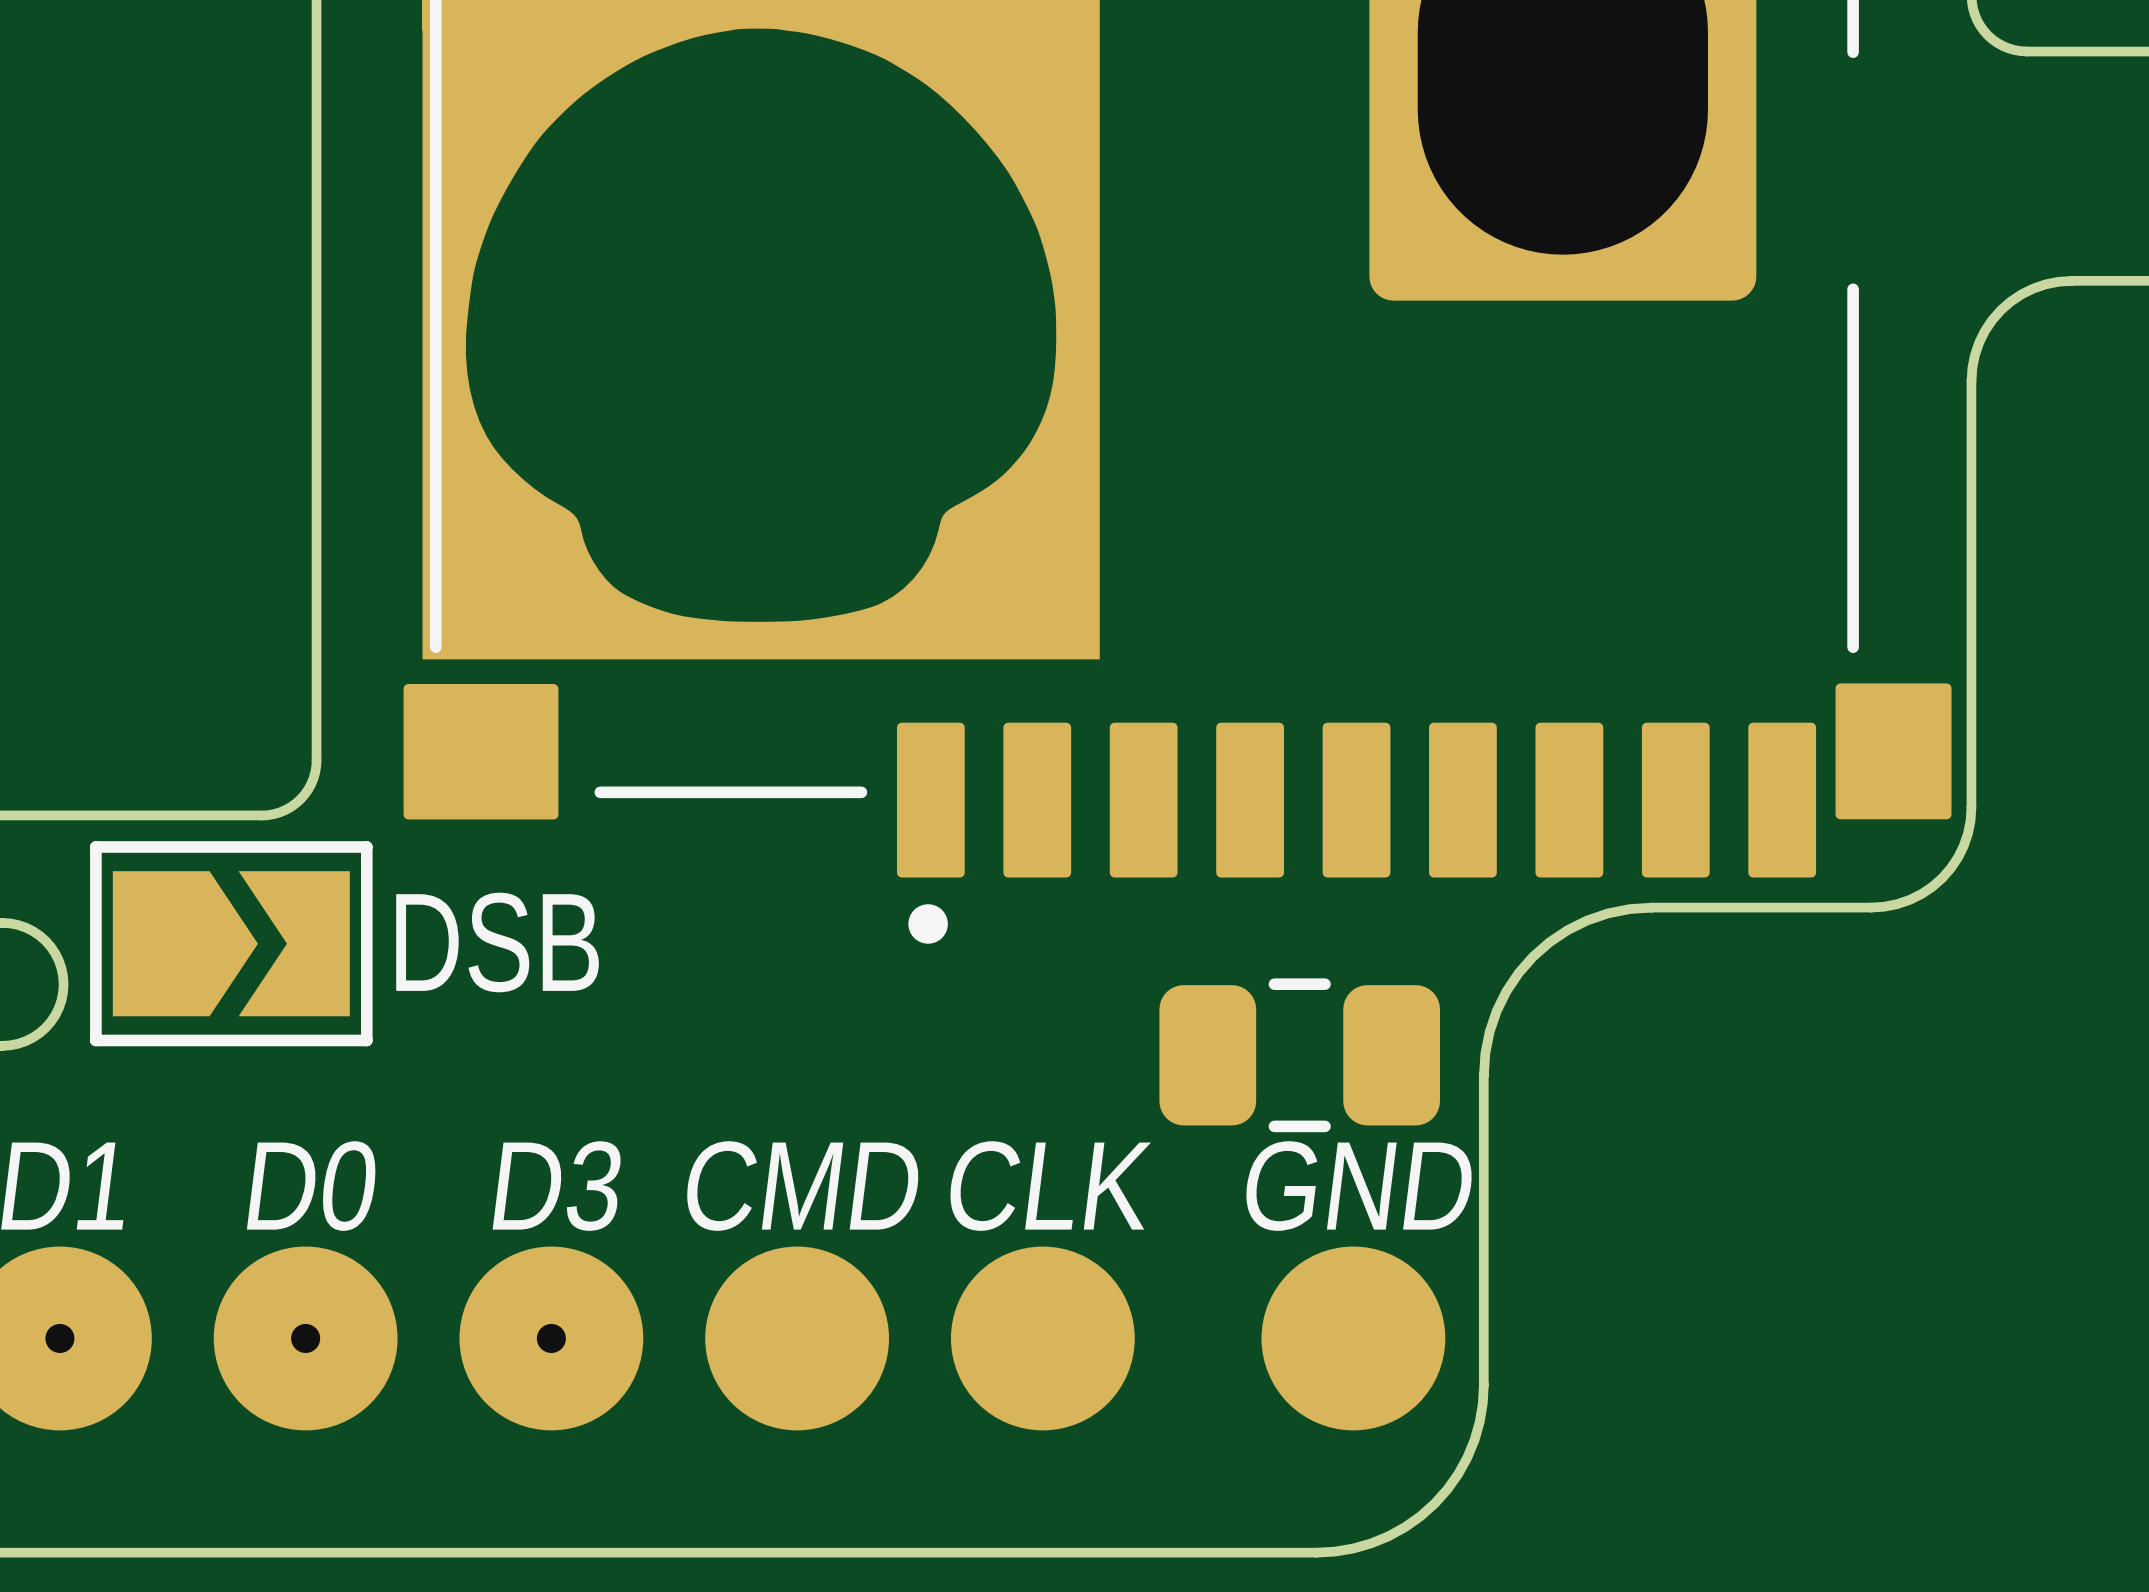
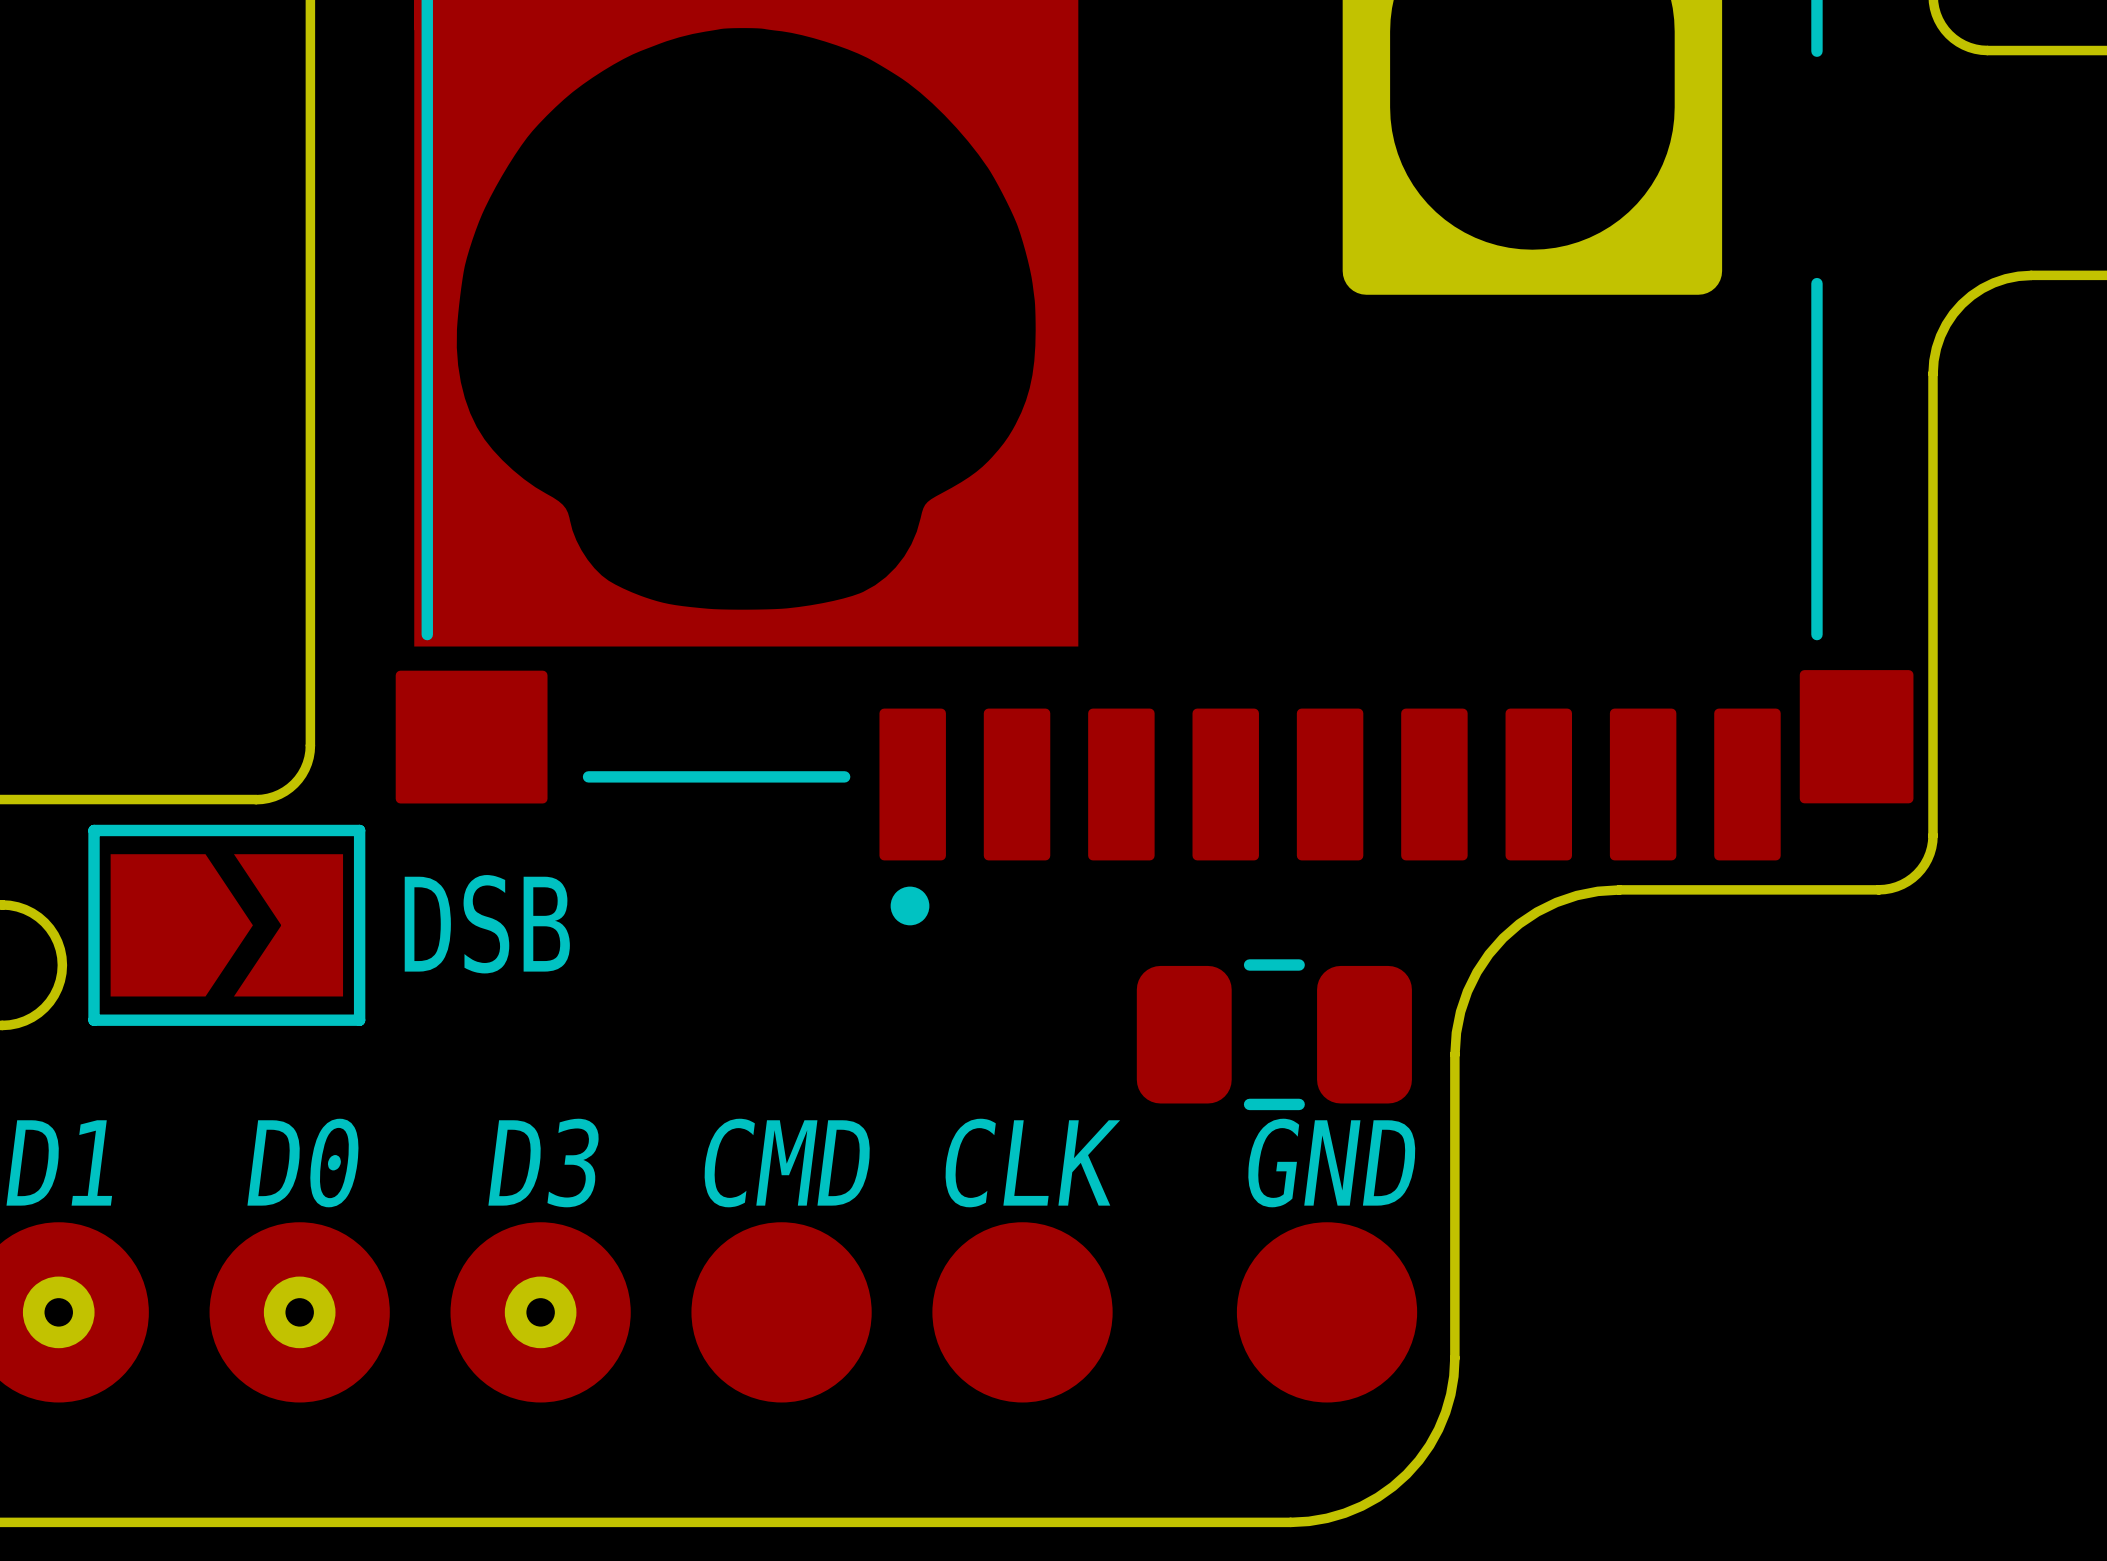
board edge: (1971, 807) (1970, 820) (1963, 845) (1950, 868) (1942, 878) (1921, 894) (1909, 899) (1897, 904) (1871, 907) -> (1933, 791) (1931, 847) (1924, 864) (1917, 873) (1902, 884) (1890, 888) (1834, 889)

